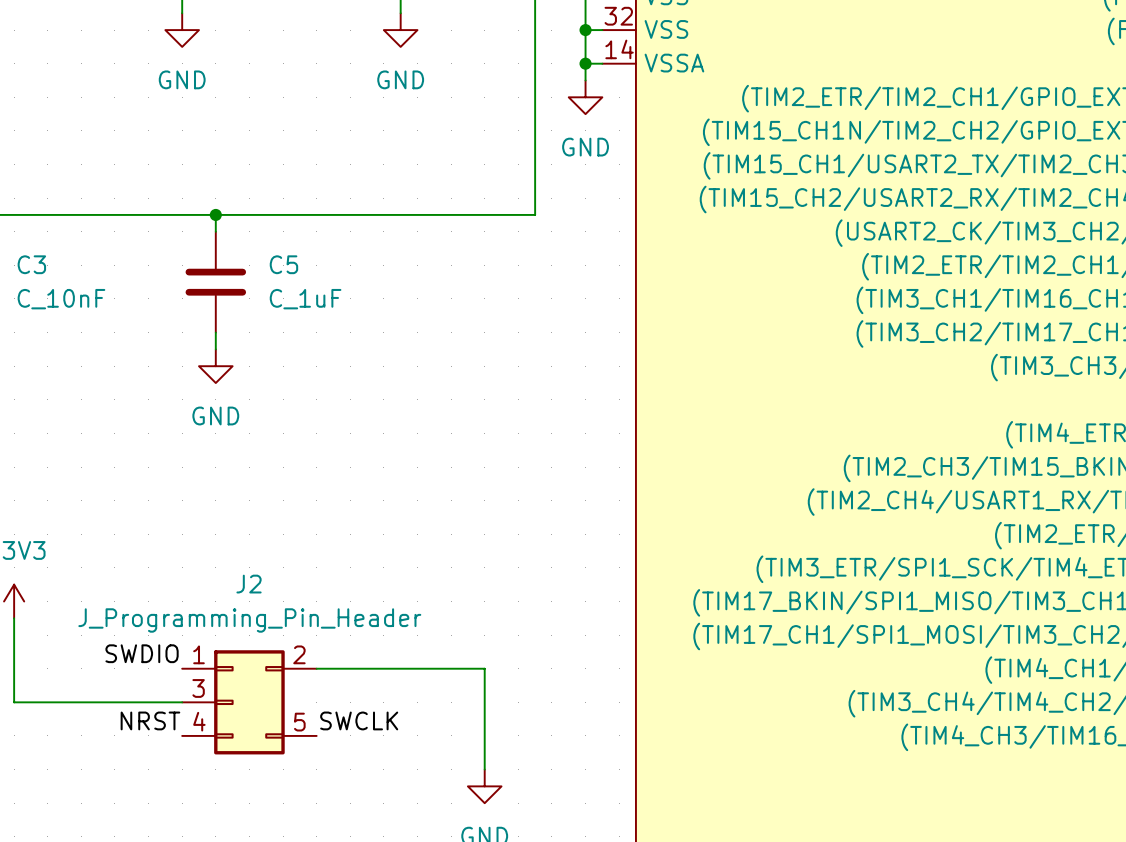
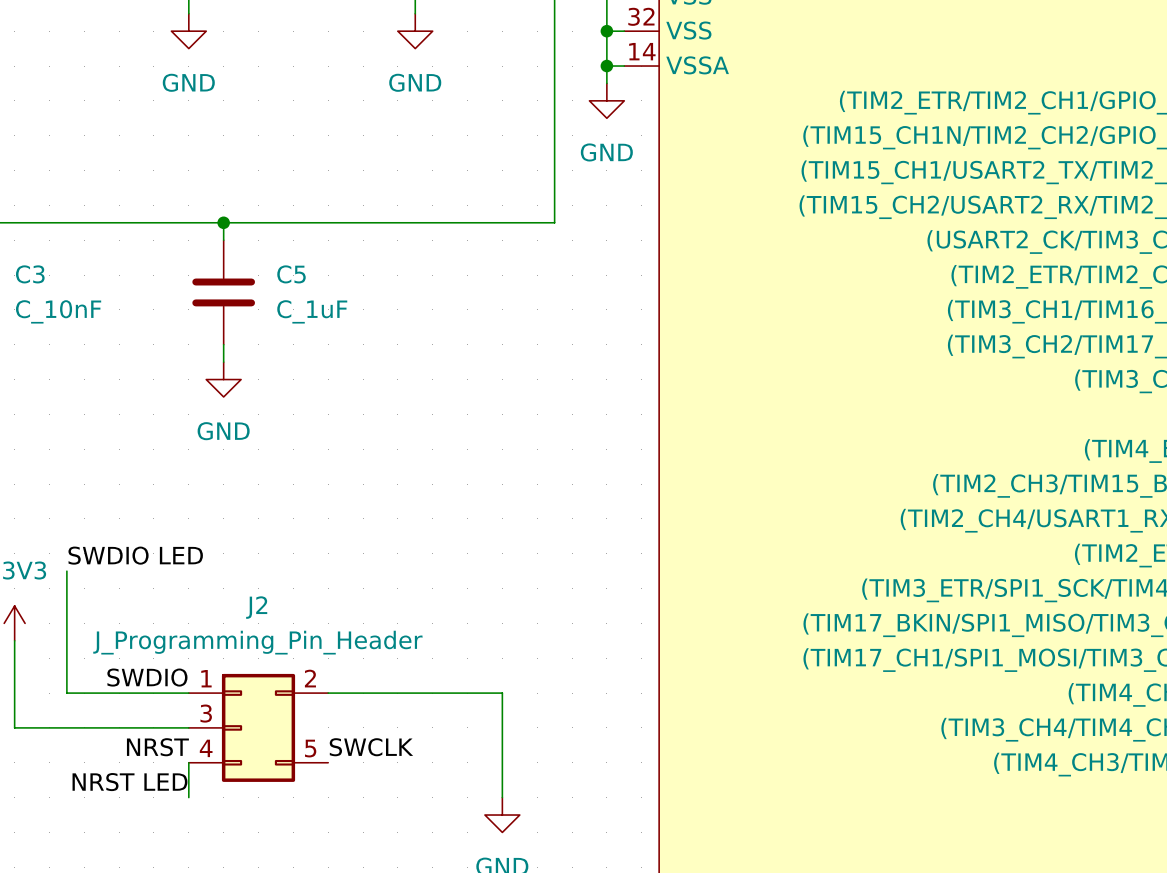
label: none -> SWDIO LED (135, 555)
wire: none -> (66, 571) (66, 693) (188, 693)
wire: none -> (188, 762) (188, 797)
label: none -> NRST LED (129, 782)

